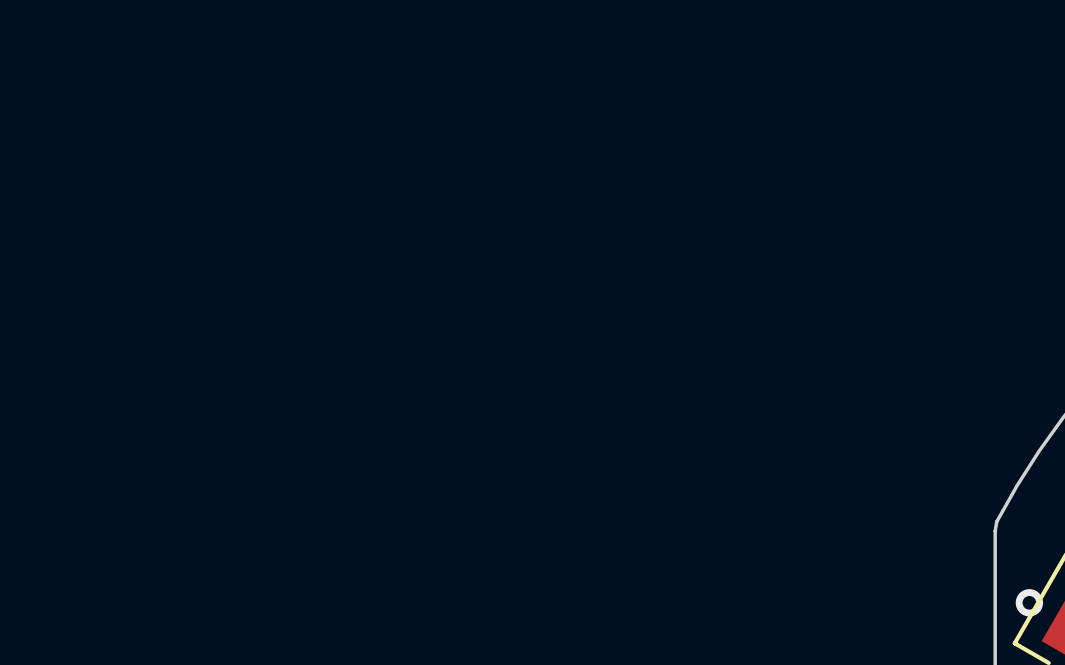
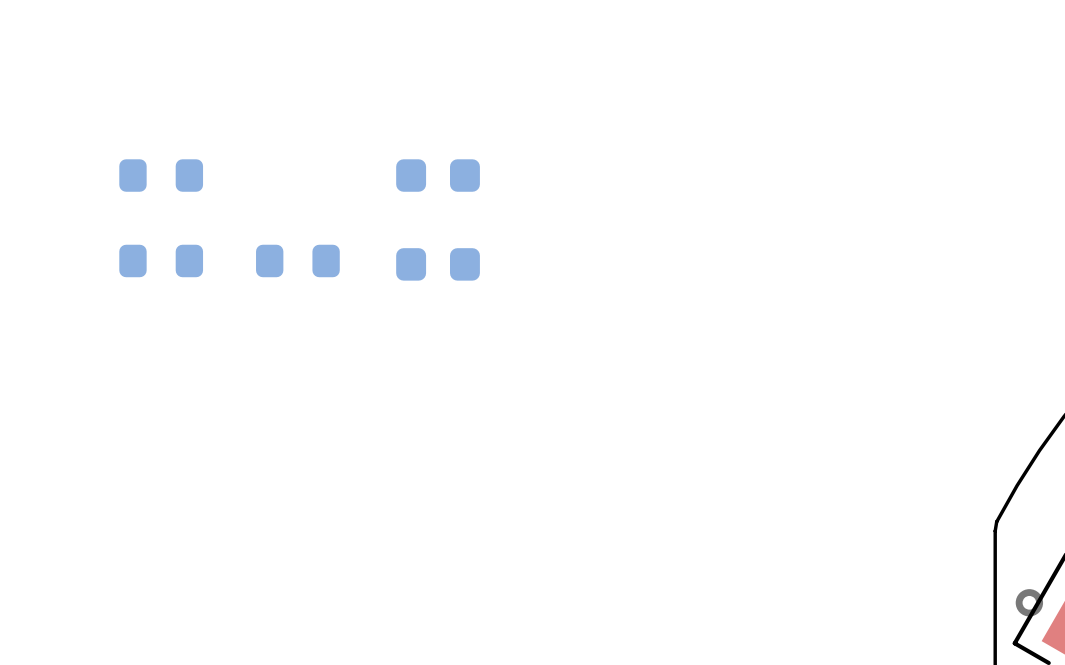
part: none -> (161, 175)
part: none -> (438, 175)
part: none -> (161, 260)
part: none -> (297, 260)
part: none -> (438, 264)

